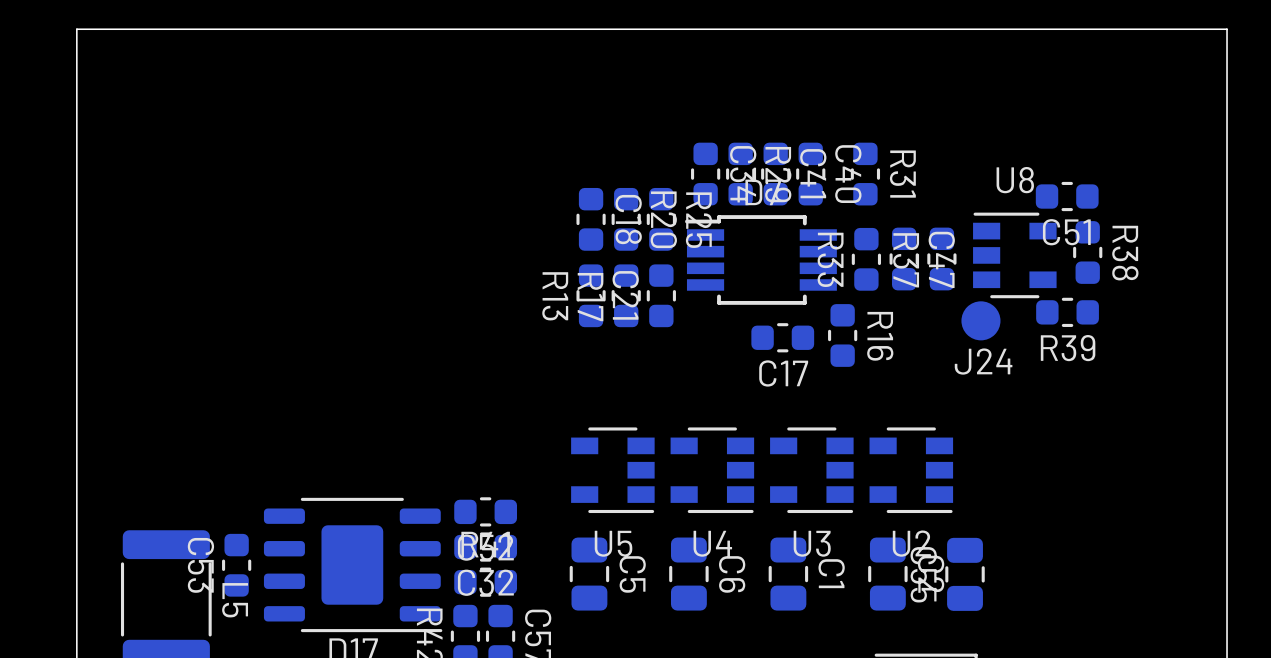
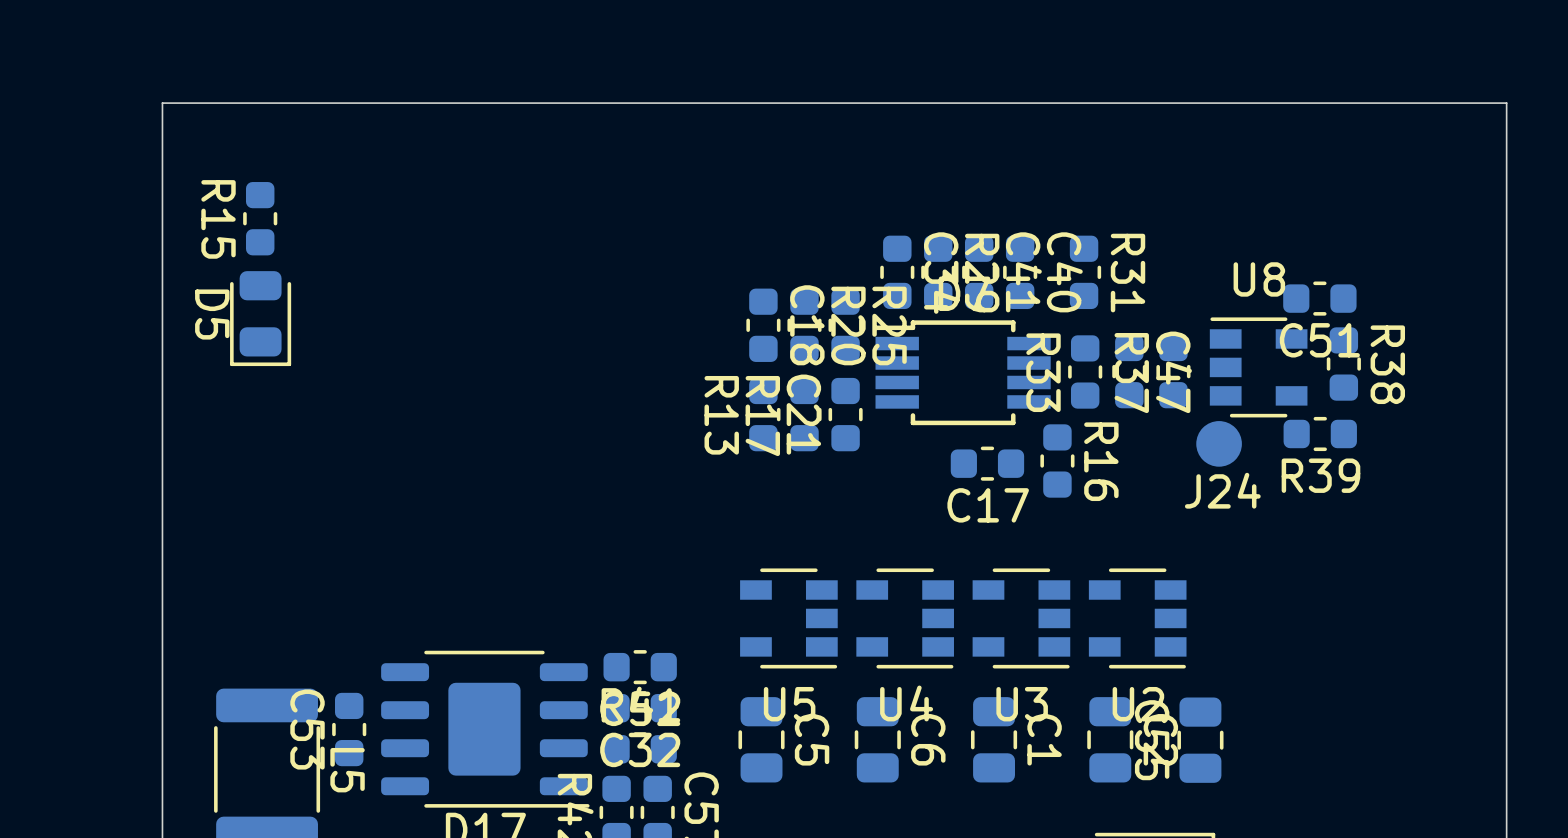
R15: none -> (260, 218)
D5: none -> (260, 318)

